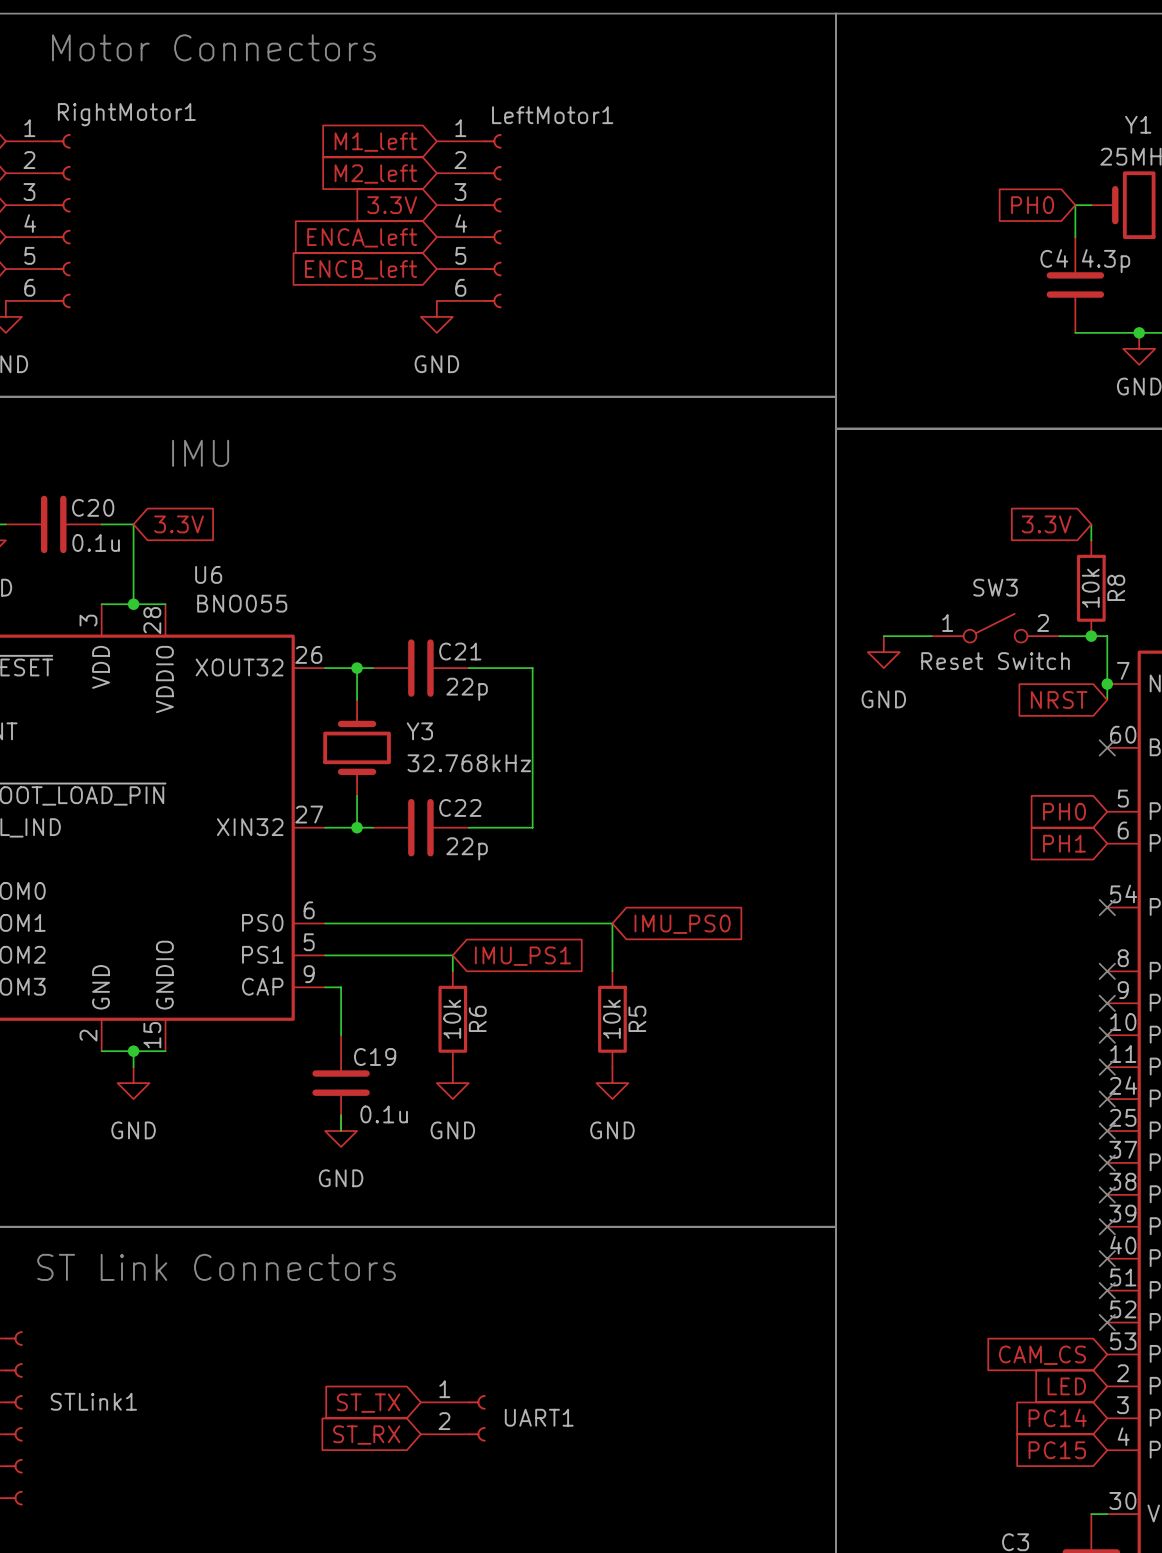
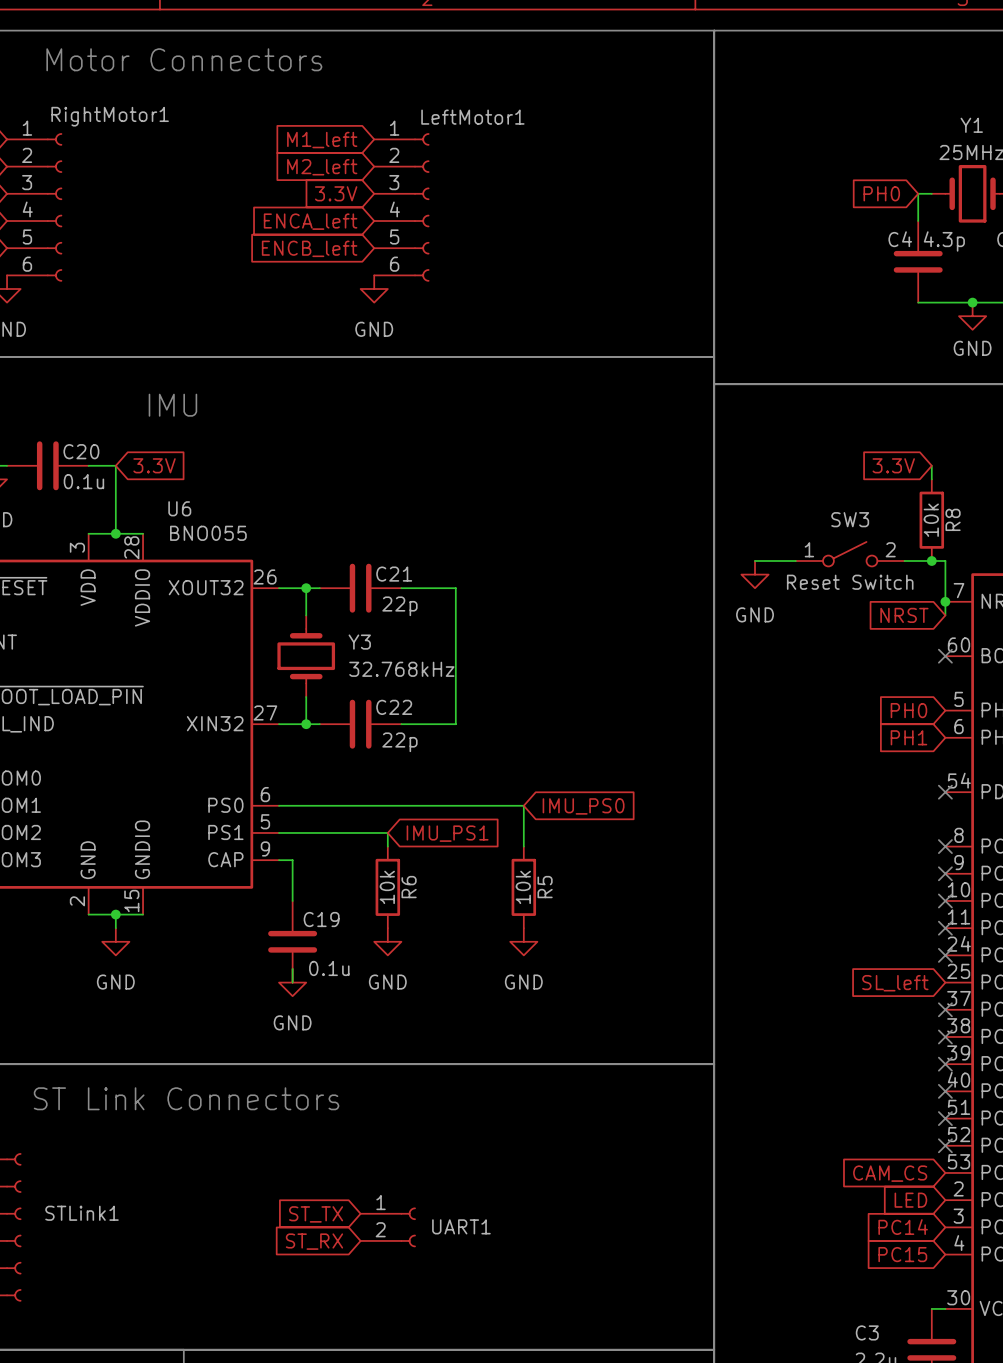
global label: none -> SL_left (895, 983)
no-connect mark: (1107, 1131) -> none

